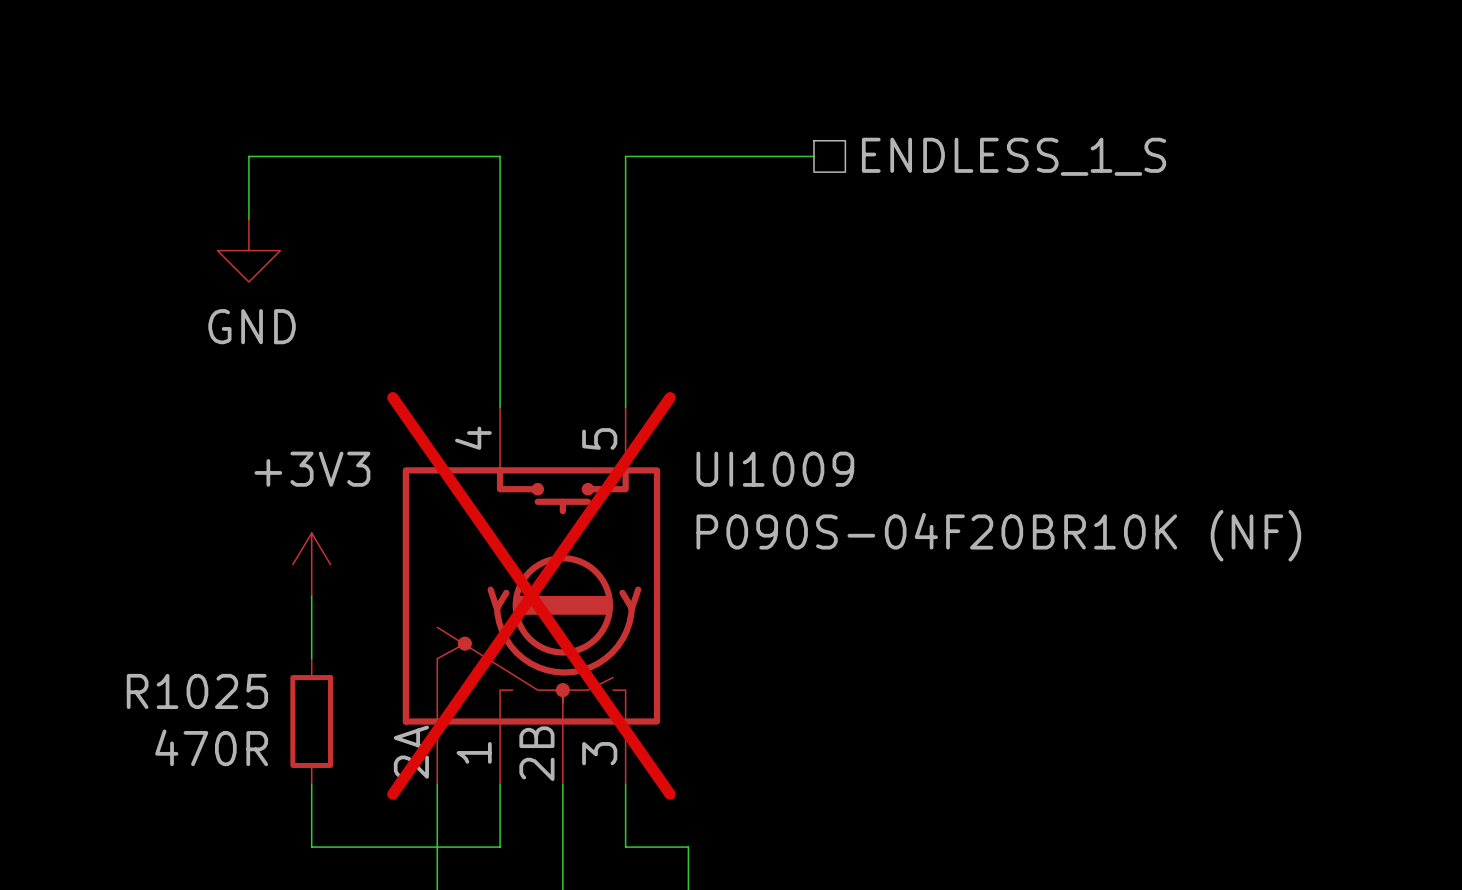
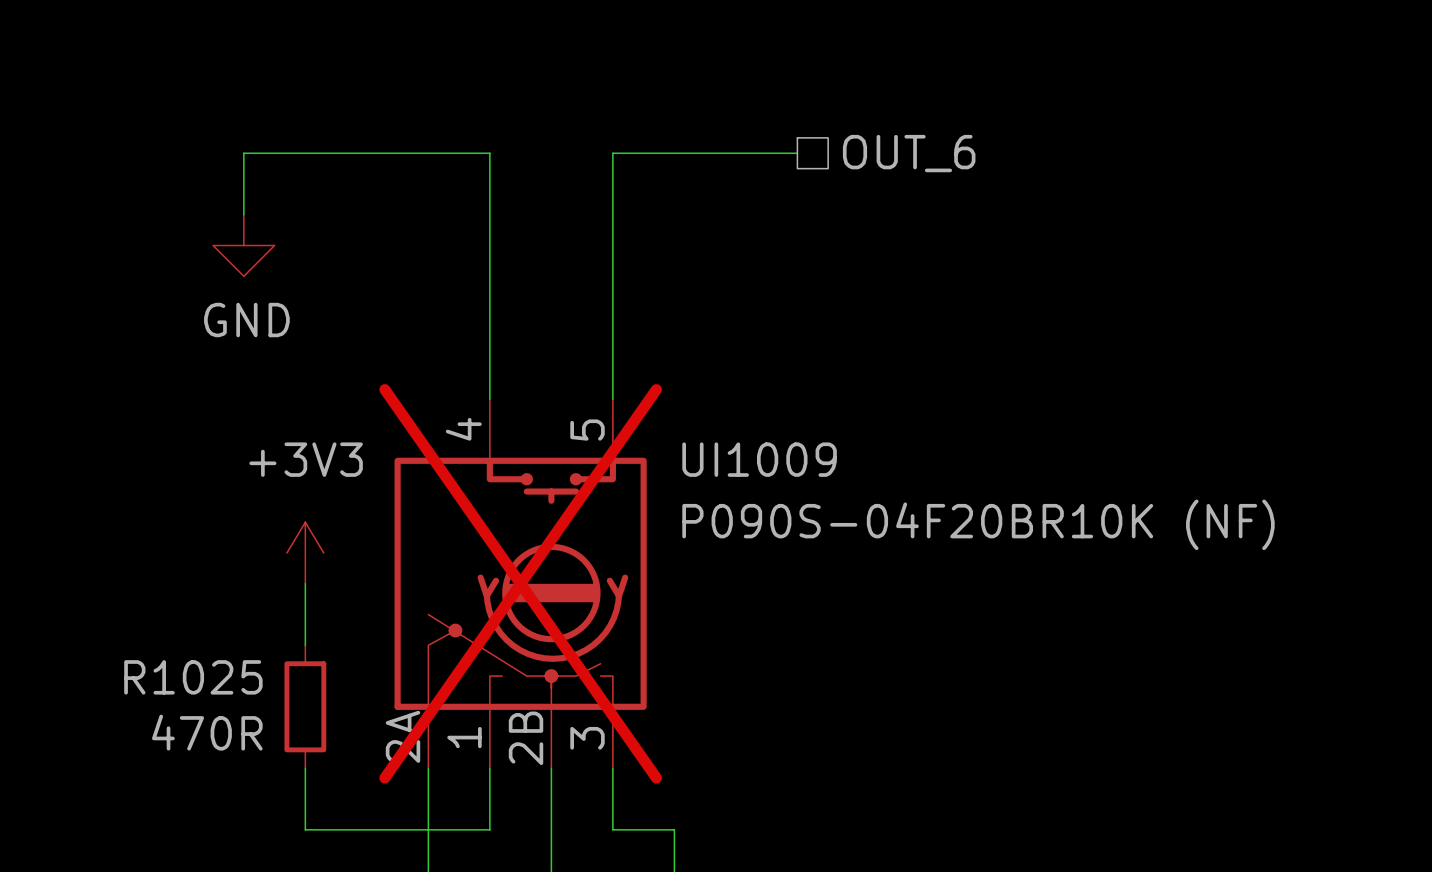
hierarchical label: ENDLESS_1_S (1014, 156) -> OUT_6 (909, 153)

